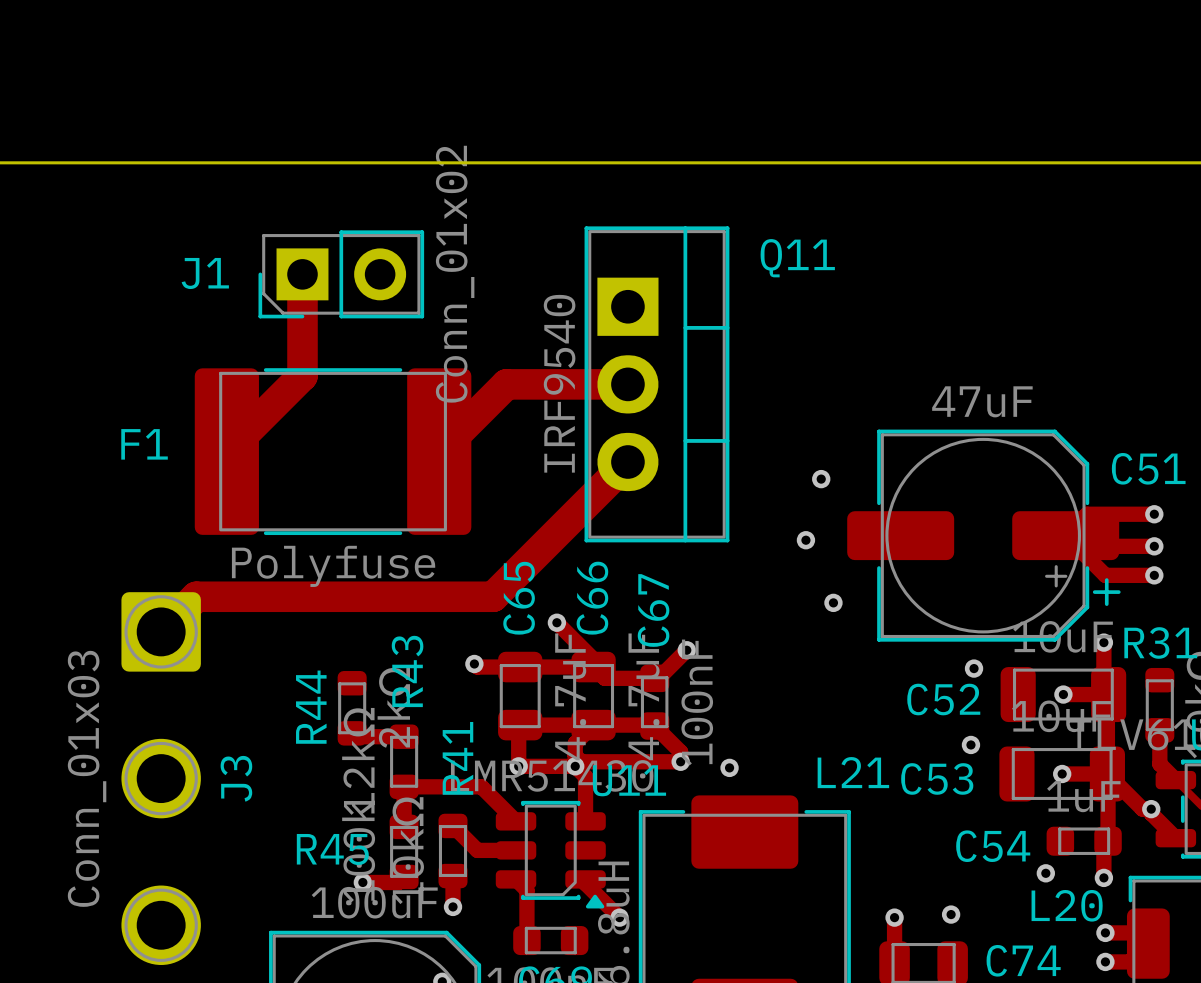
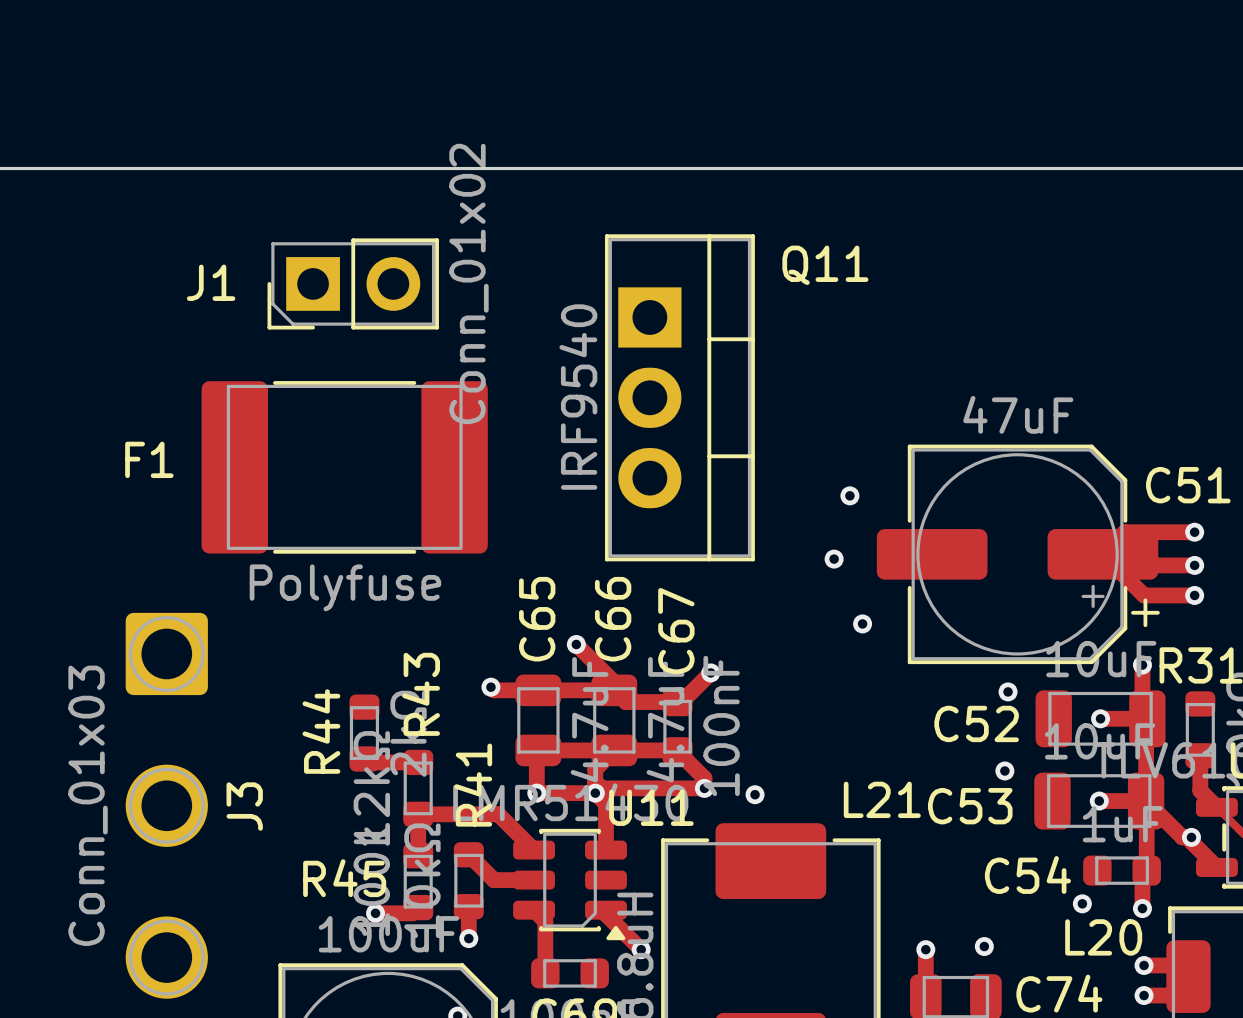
top track: (302, 274) (302, 375) (226, 451) -> none
top track: (627, 384) (506, 384) (439, 451) -> none
top track: (627, 461) (493, 596) (196, 596) (161, 631) -> none

